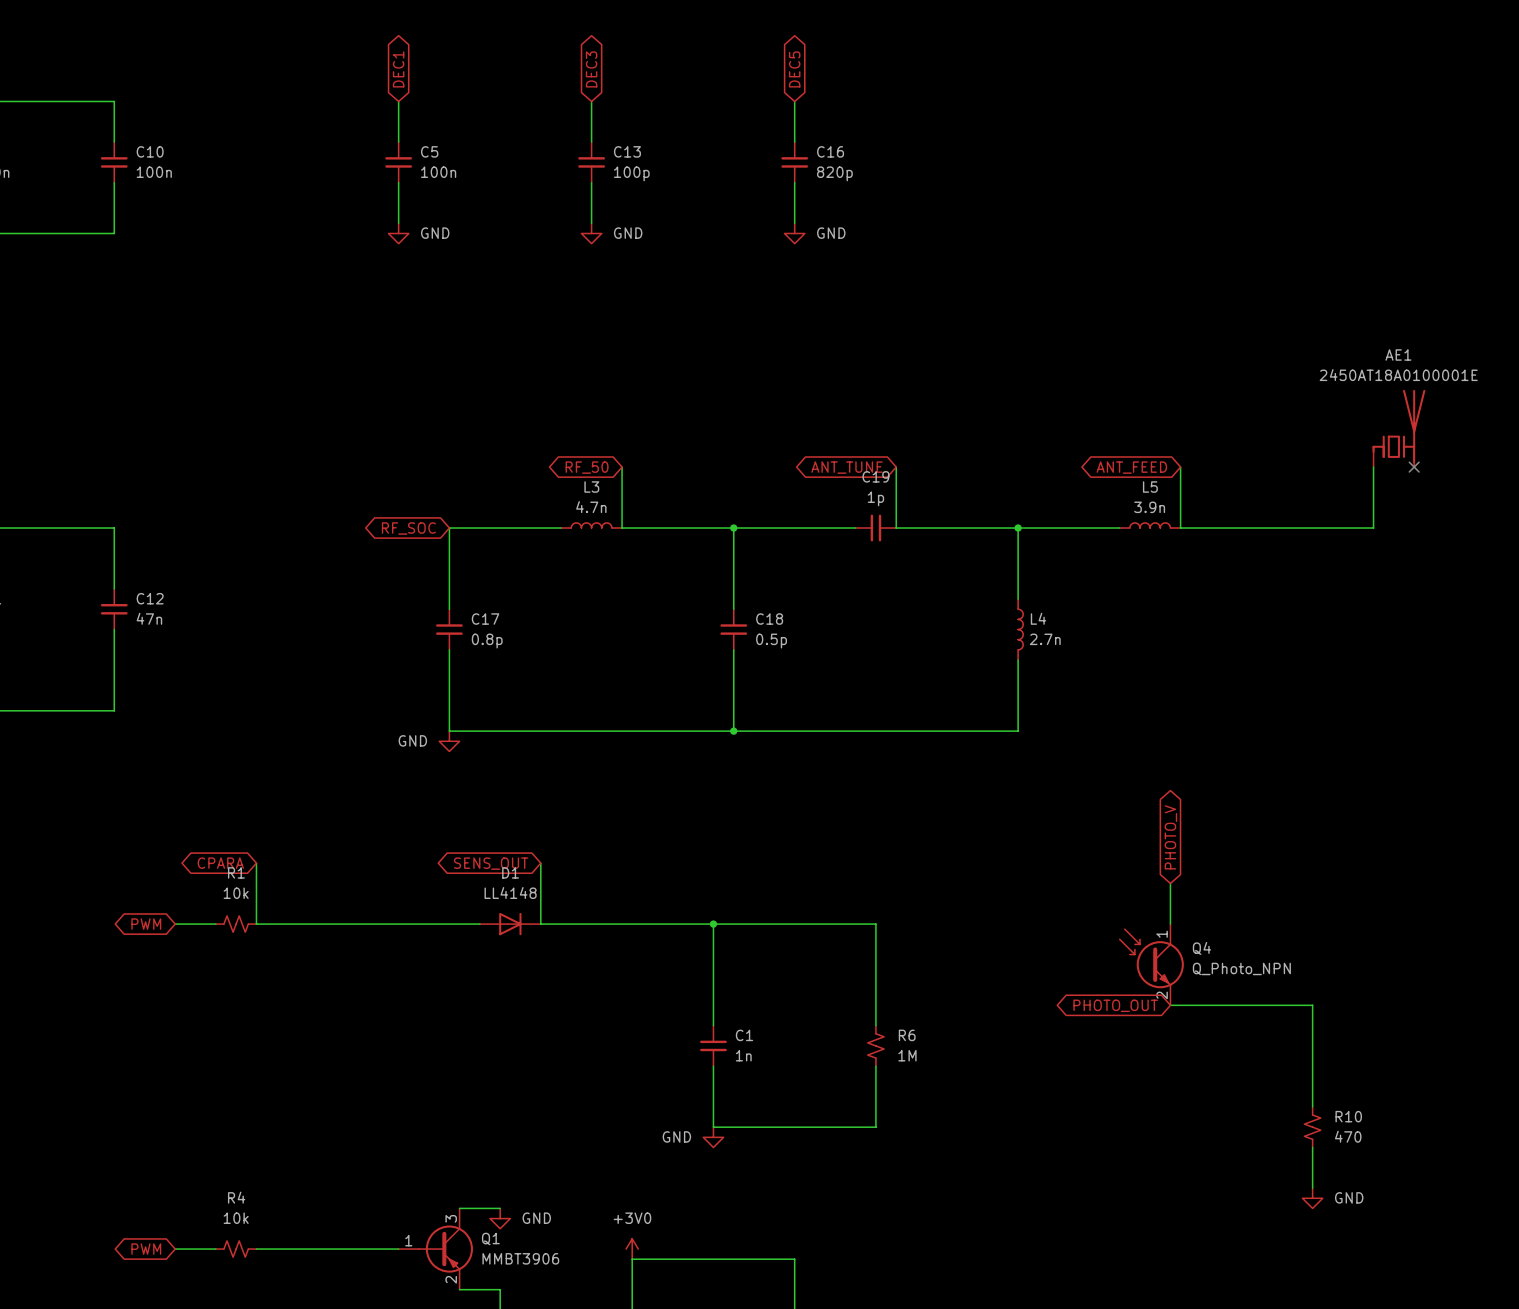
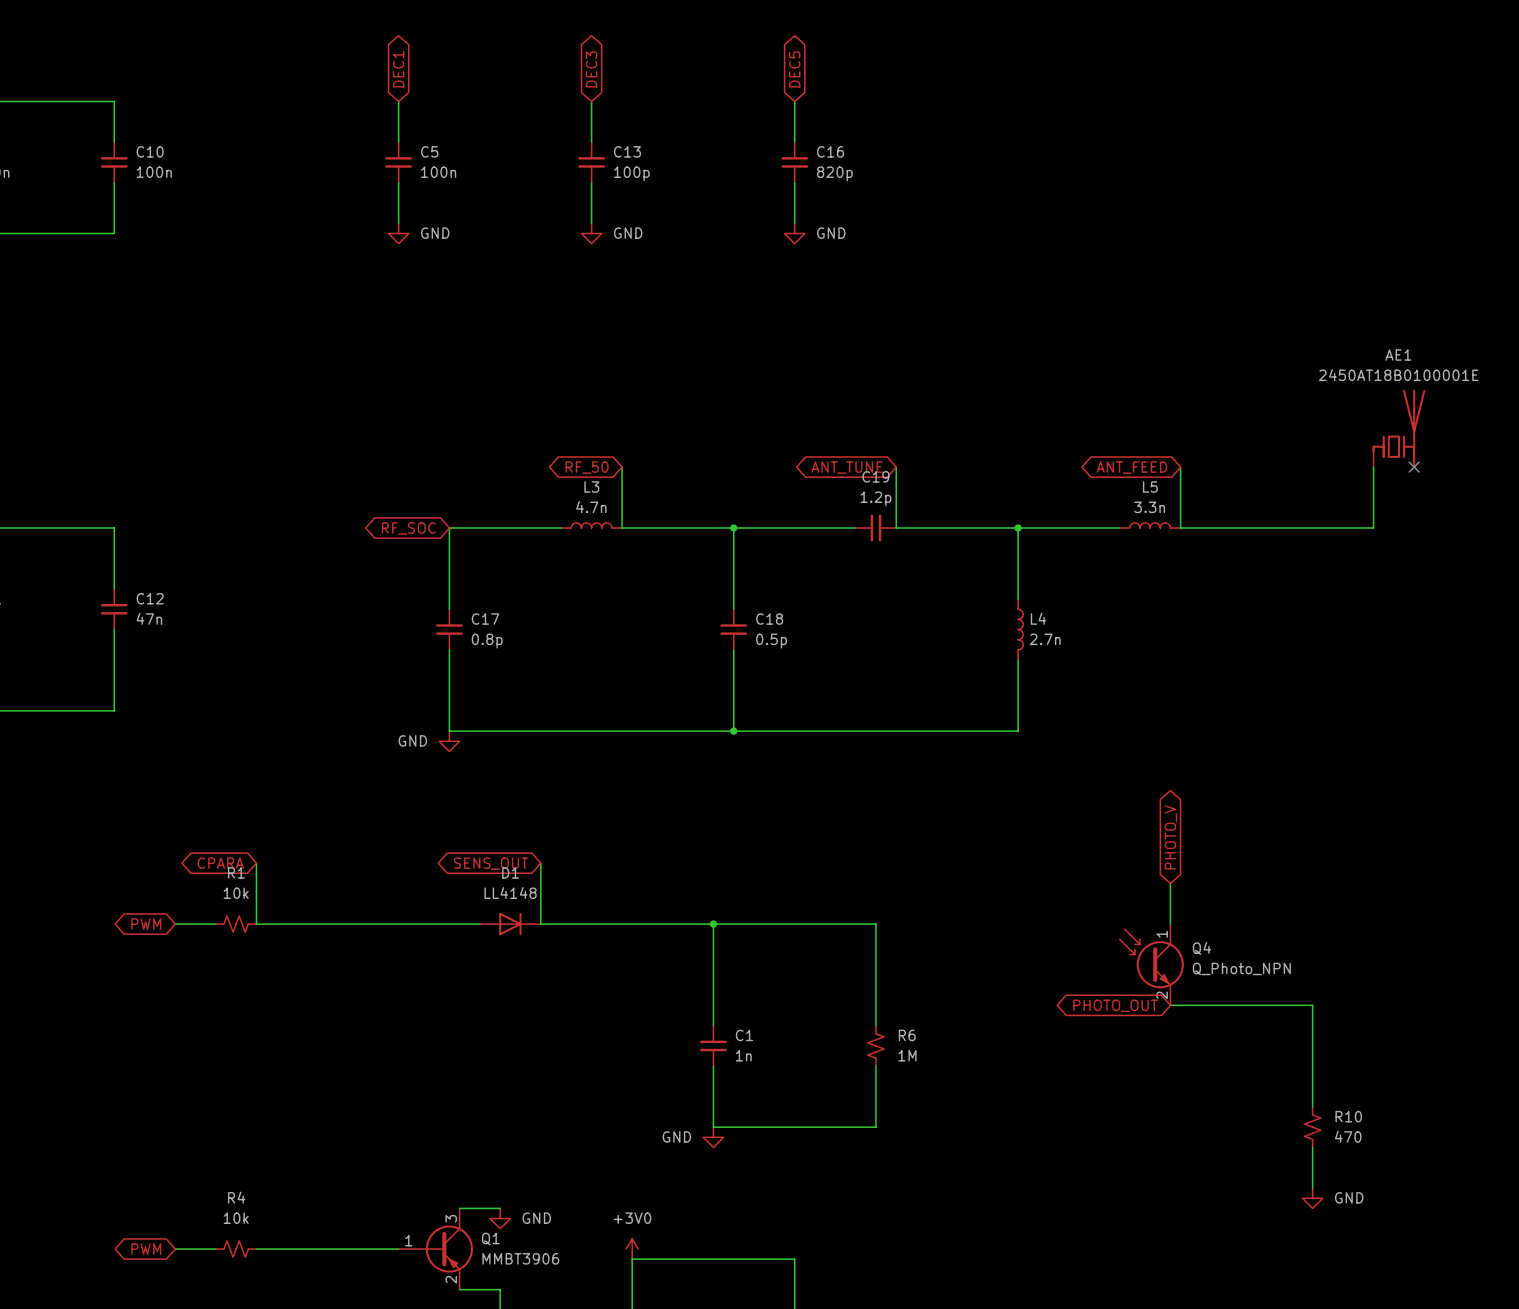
AE1 value: 2450AT18A0100001E (1398, 375) -> 2450AT18B0100001E (1398, 375)
C19 value: 1p (875, 498) -> 1.2p (875, 498)
L5 value: 3.9n (1149, 507) -> 3.3n (1149, 507)

